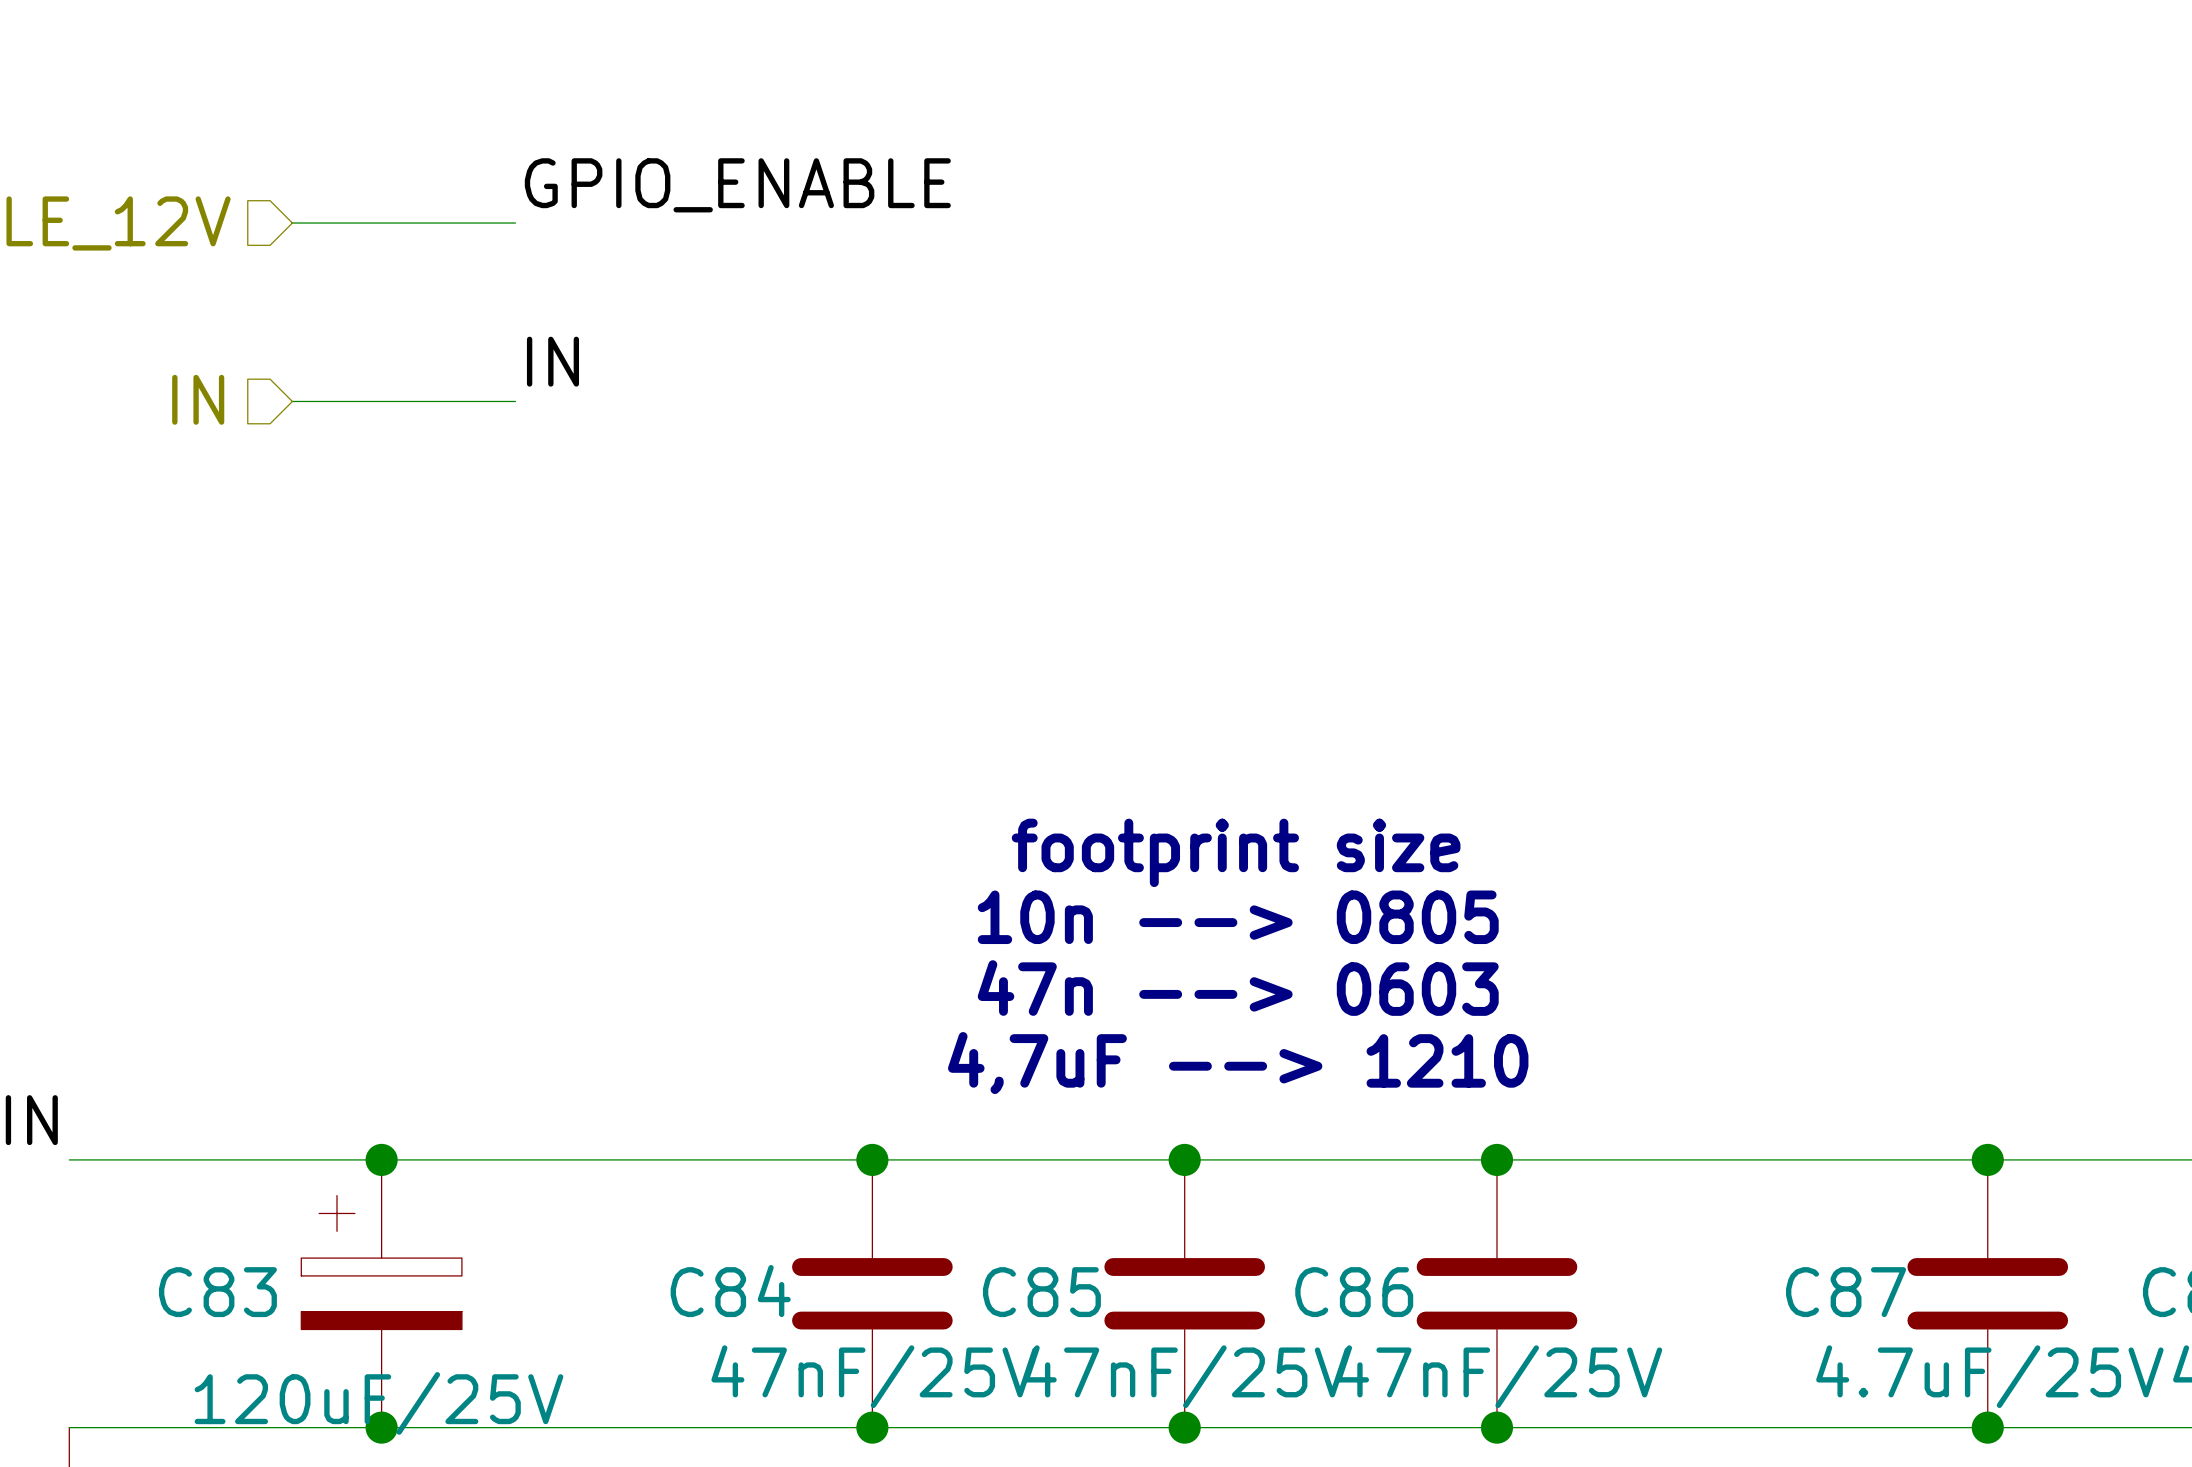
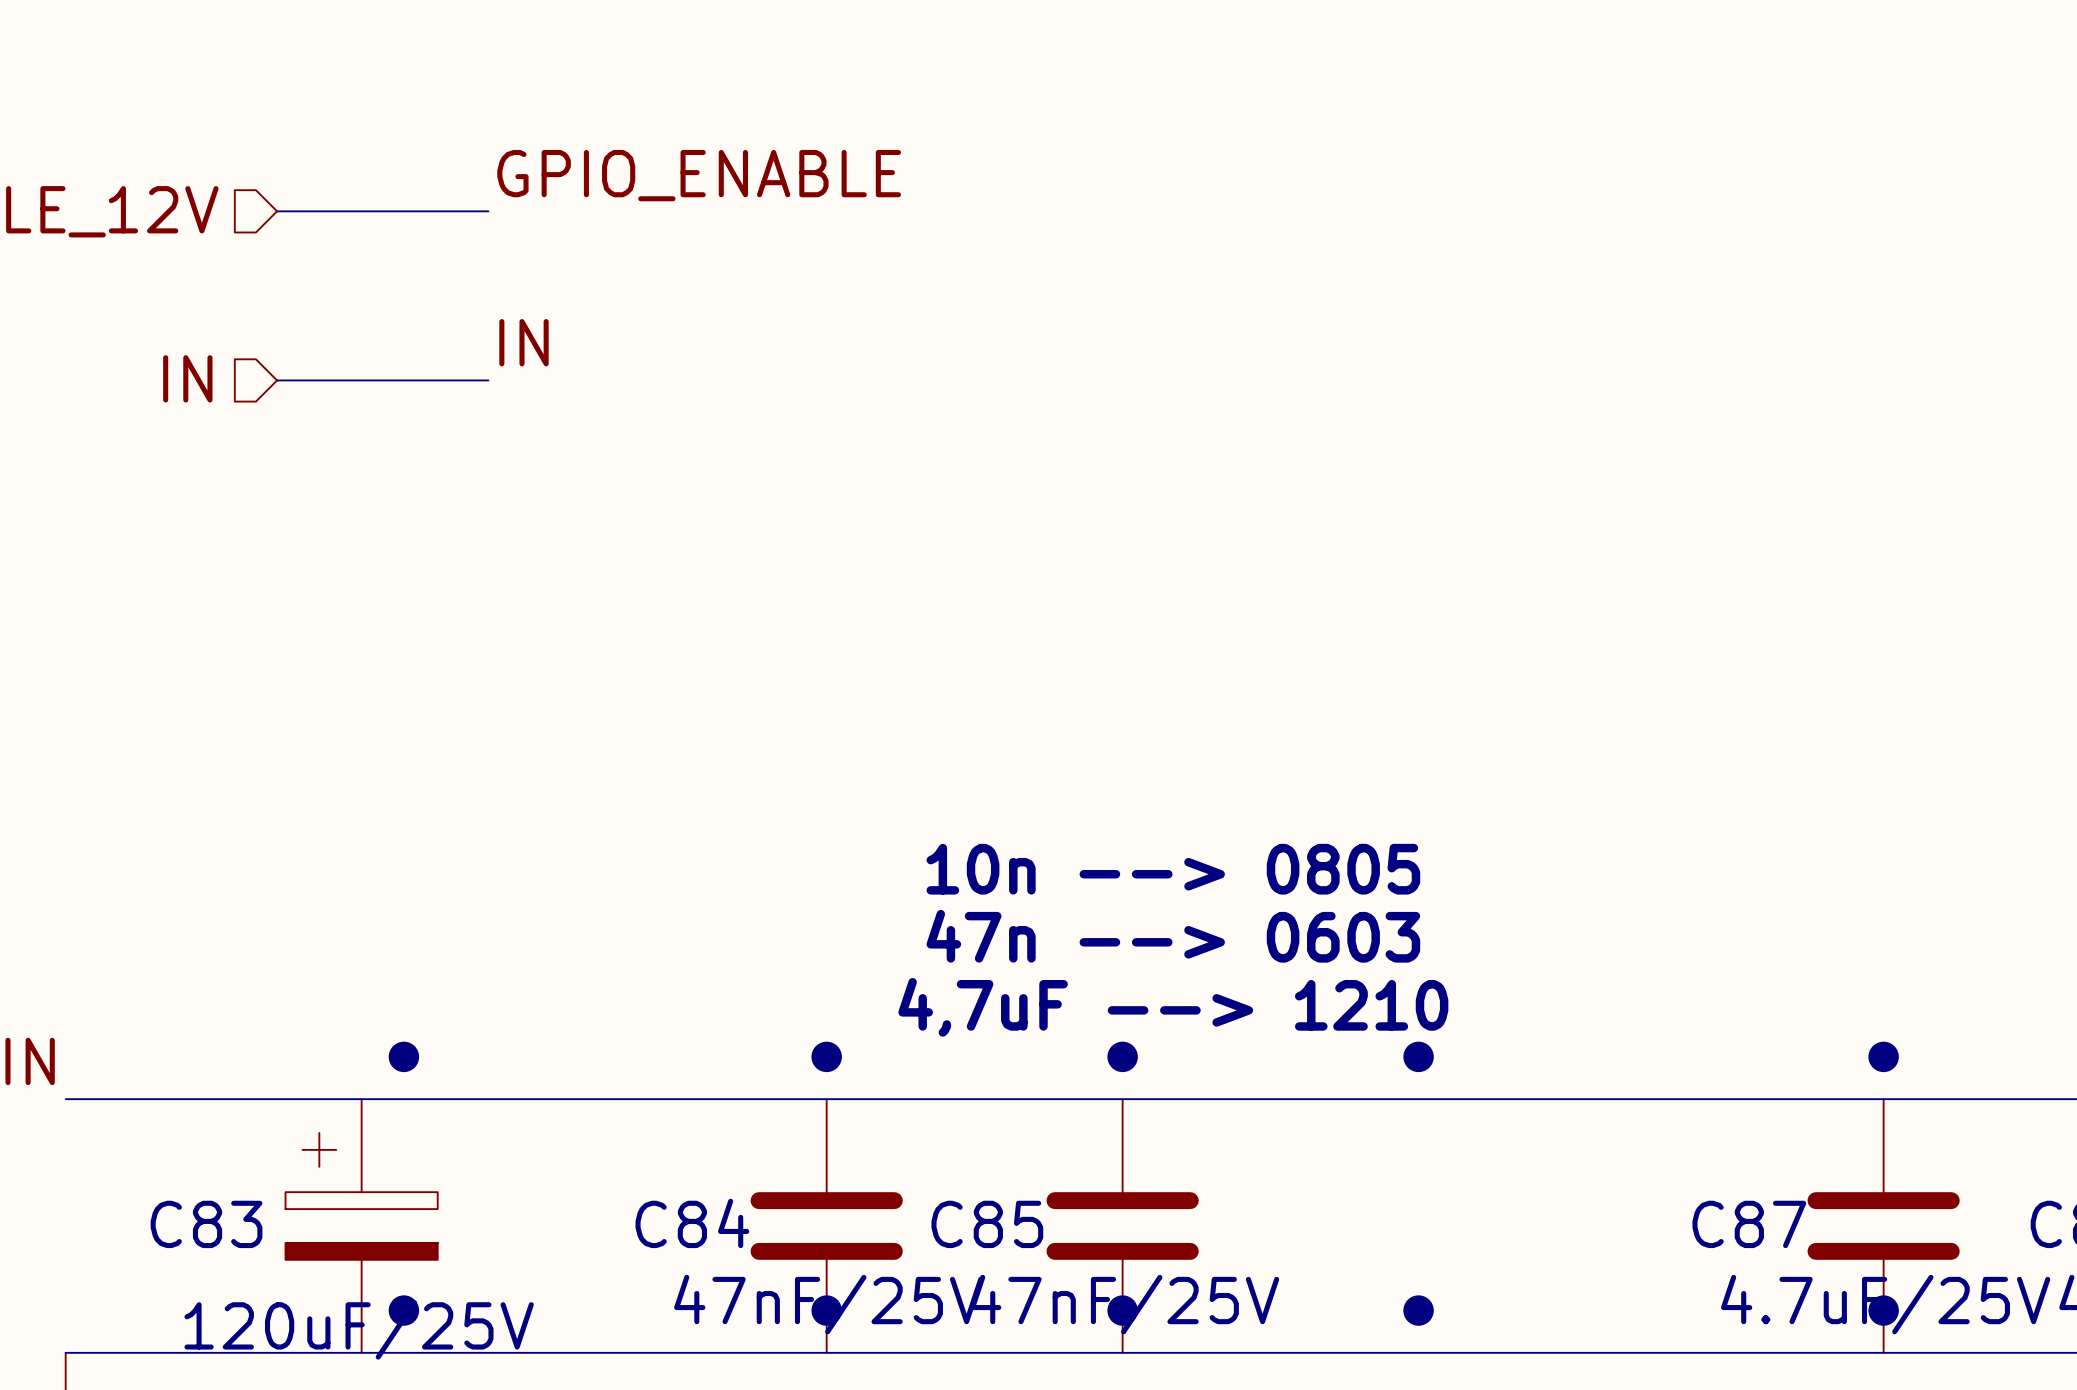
text: footprint size (1236, 852) -> none
junction position: (381, 1159) -> (403, 1056)
junction position: (872, 1159) -> (826, 1056)
junction position: (1184, 1159) -> (1122, 1056)
junction position: (1496, 1159) -> (1418, 1056)
junction position: (1987, 1159) -> (1883, 1056)
C86: 47nF/25V (1496, 1293) -> none
junction position: (381, 1427) -> (403, 1310)
junction position: (872, 1427) -> (826, 1310)
junction position: (1184, 1427) -> (1122, 1310)
junction position: (1496, 1427) -> (1418, 1310)
junction position: (1987, 1427) -> (1883, 1310)

